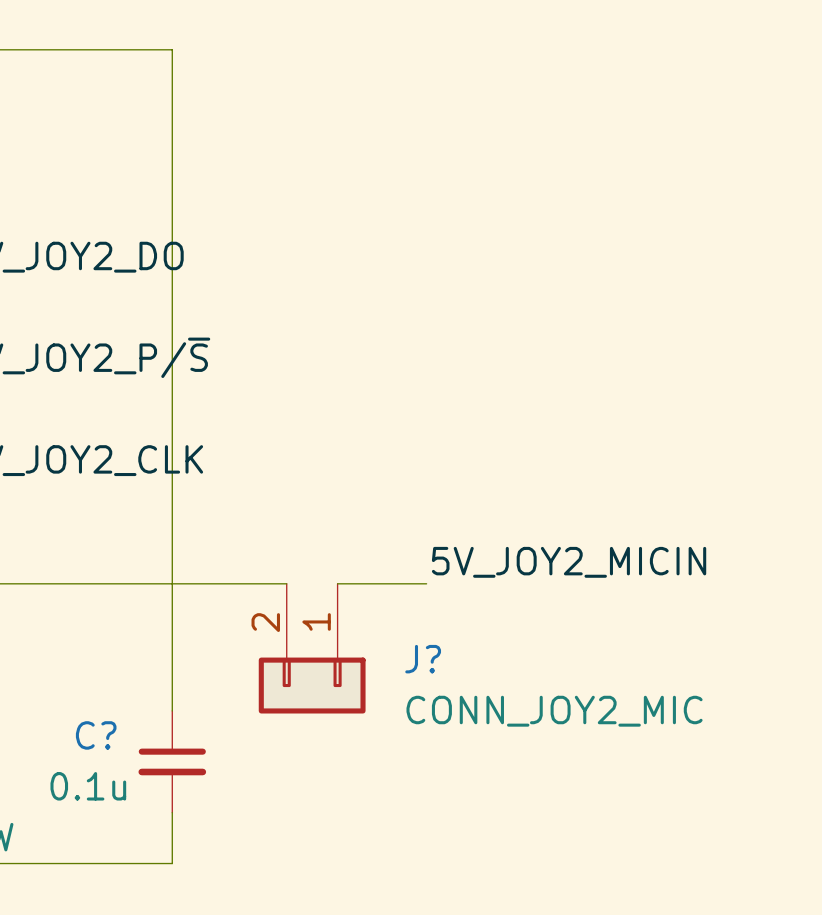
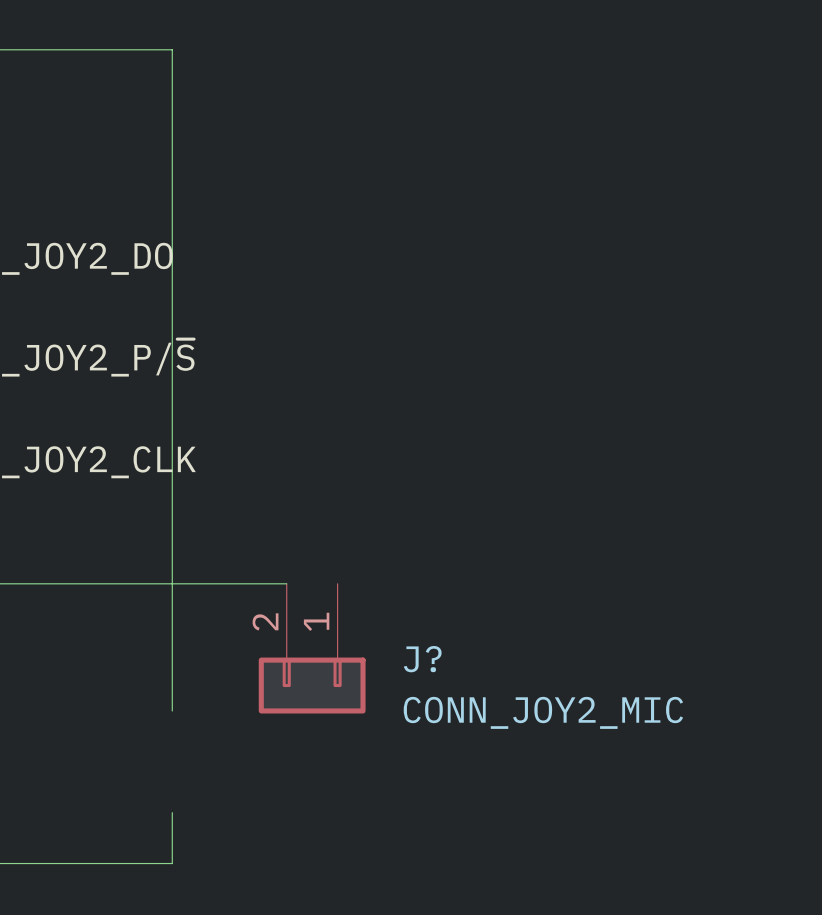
label: 5V_JOY2_MICIN (569, 562) -> none
wire: (337, 583) (426, 583) -> none
C?: 0.1u (172, 761) -> none

